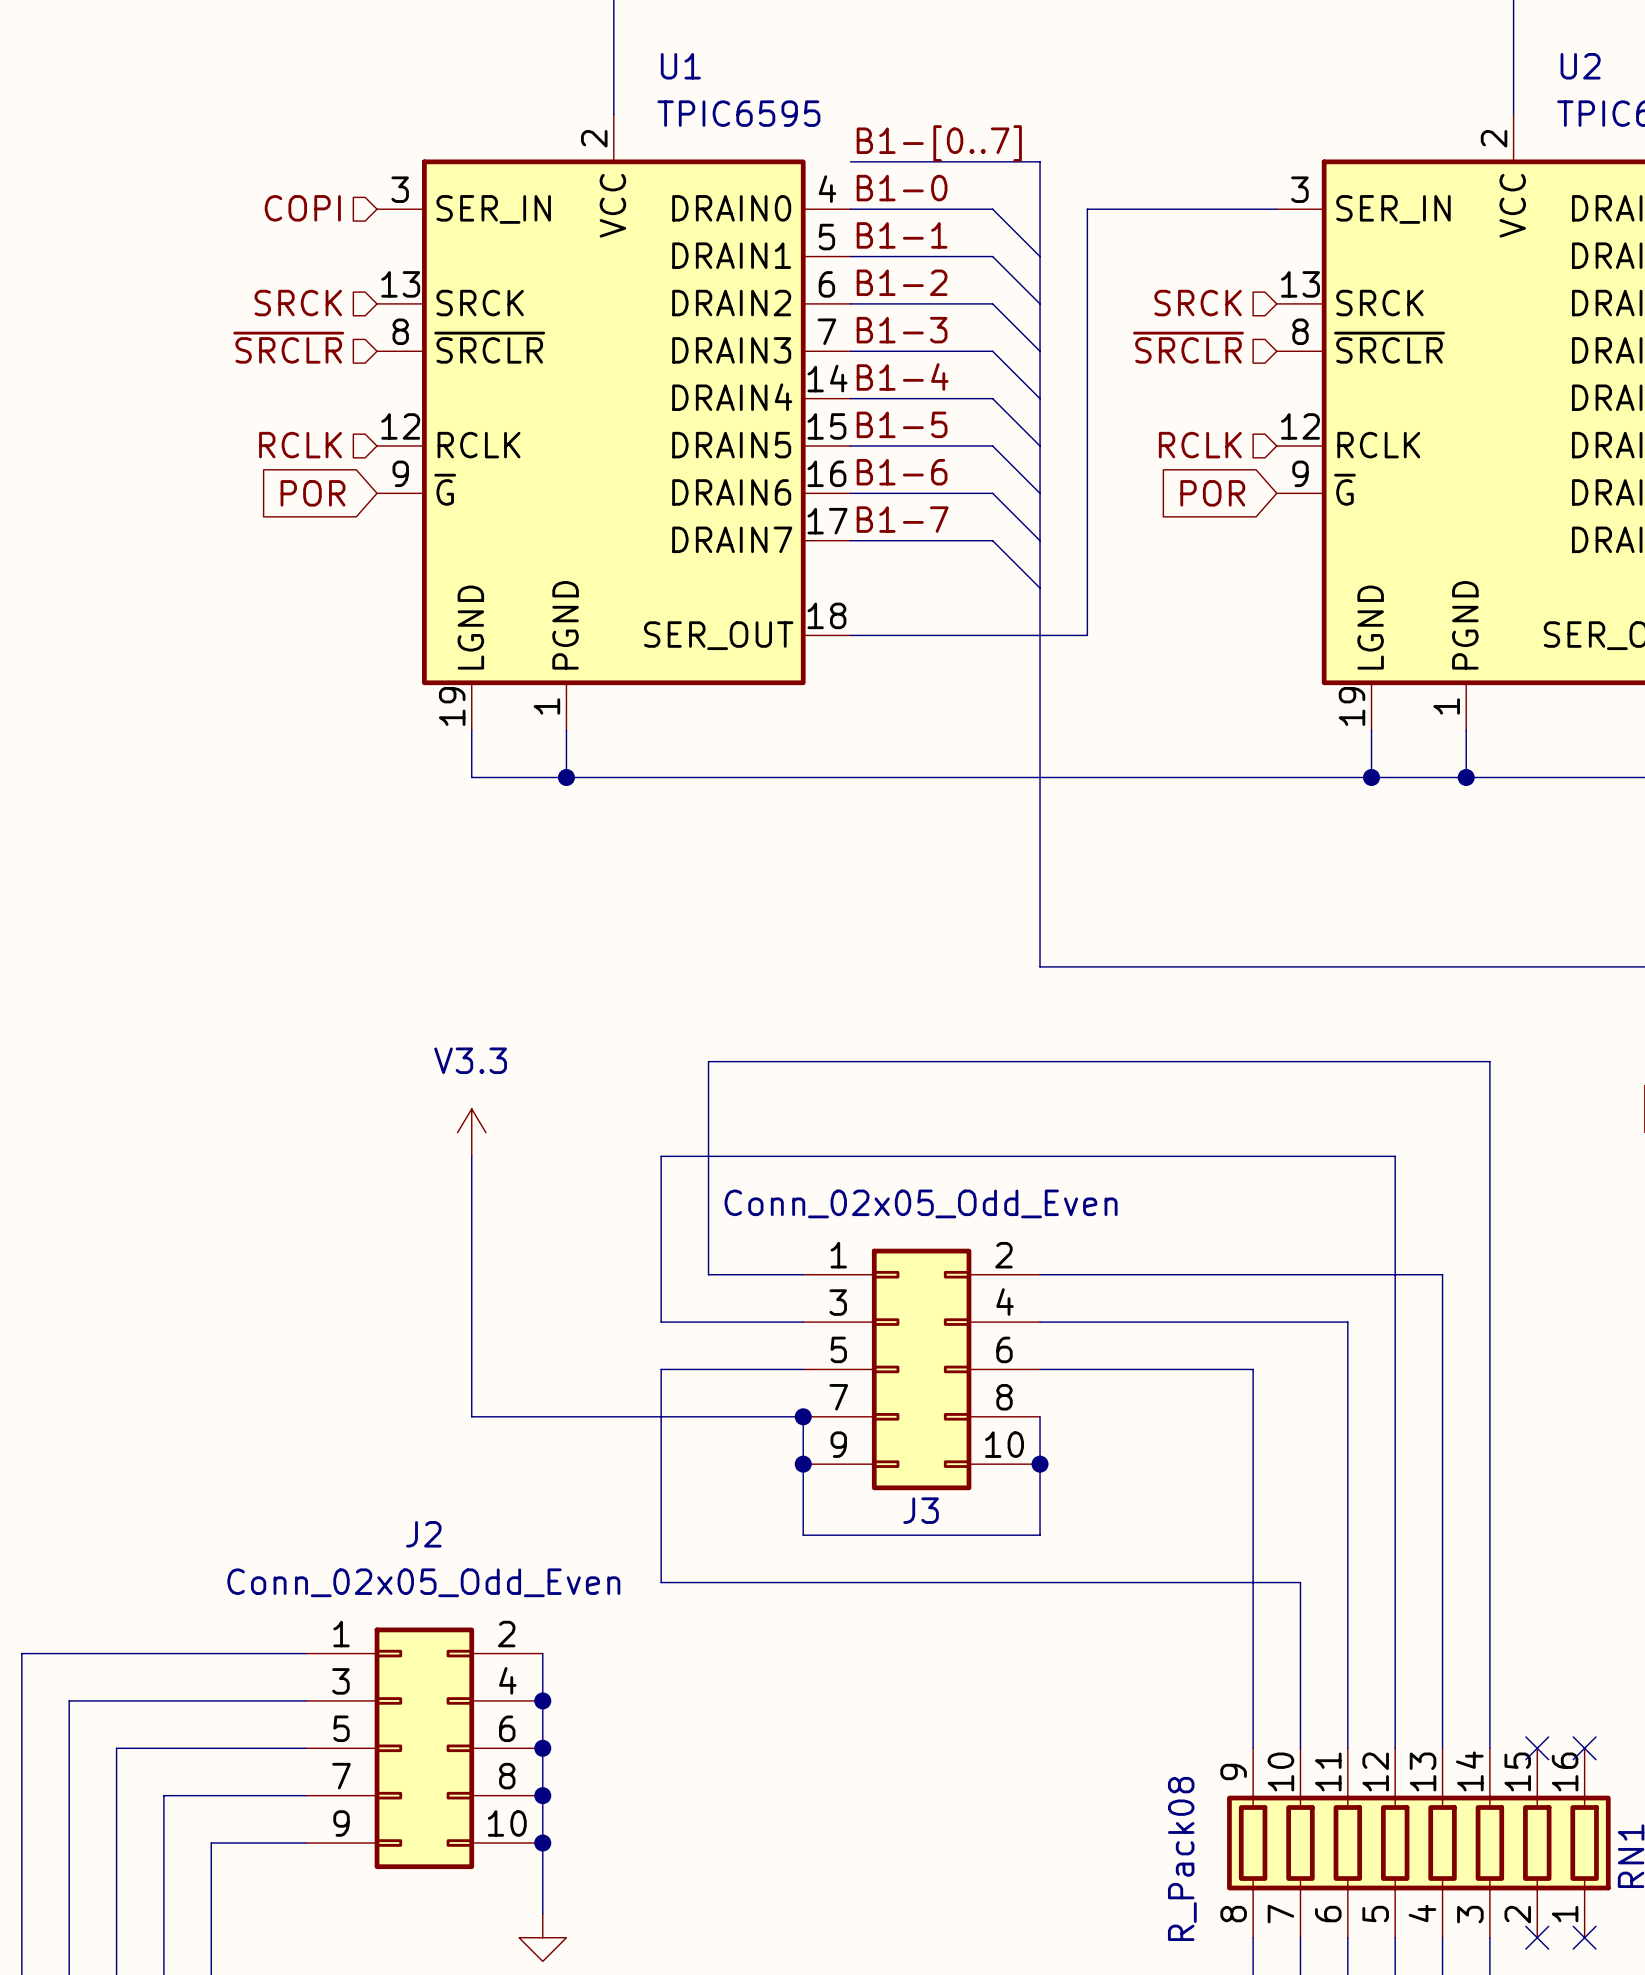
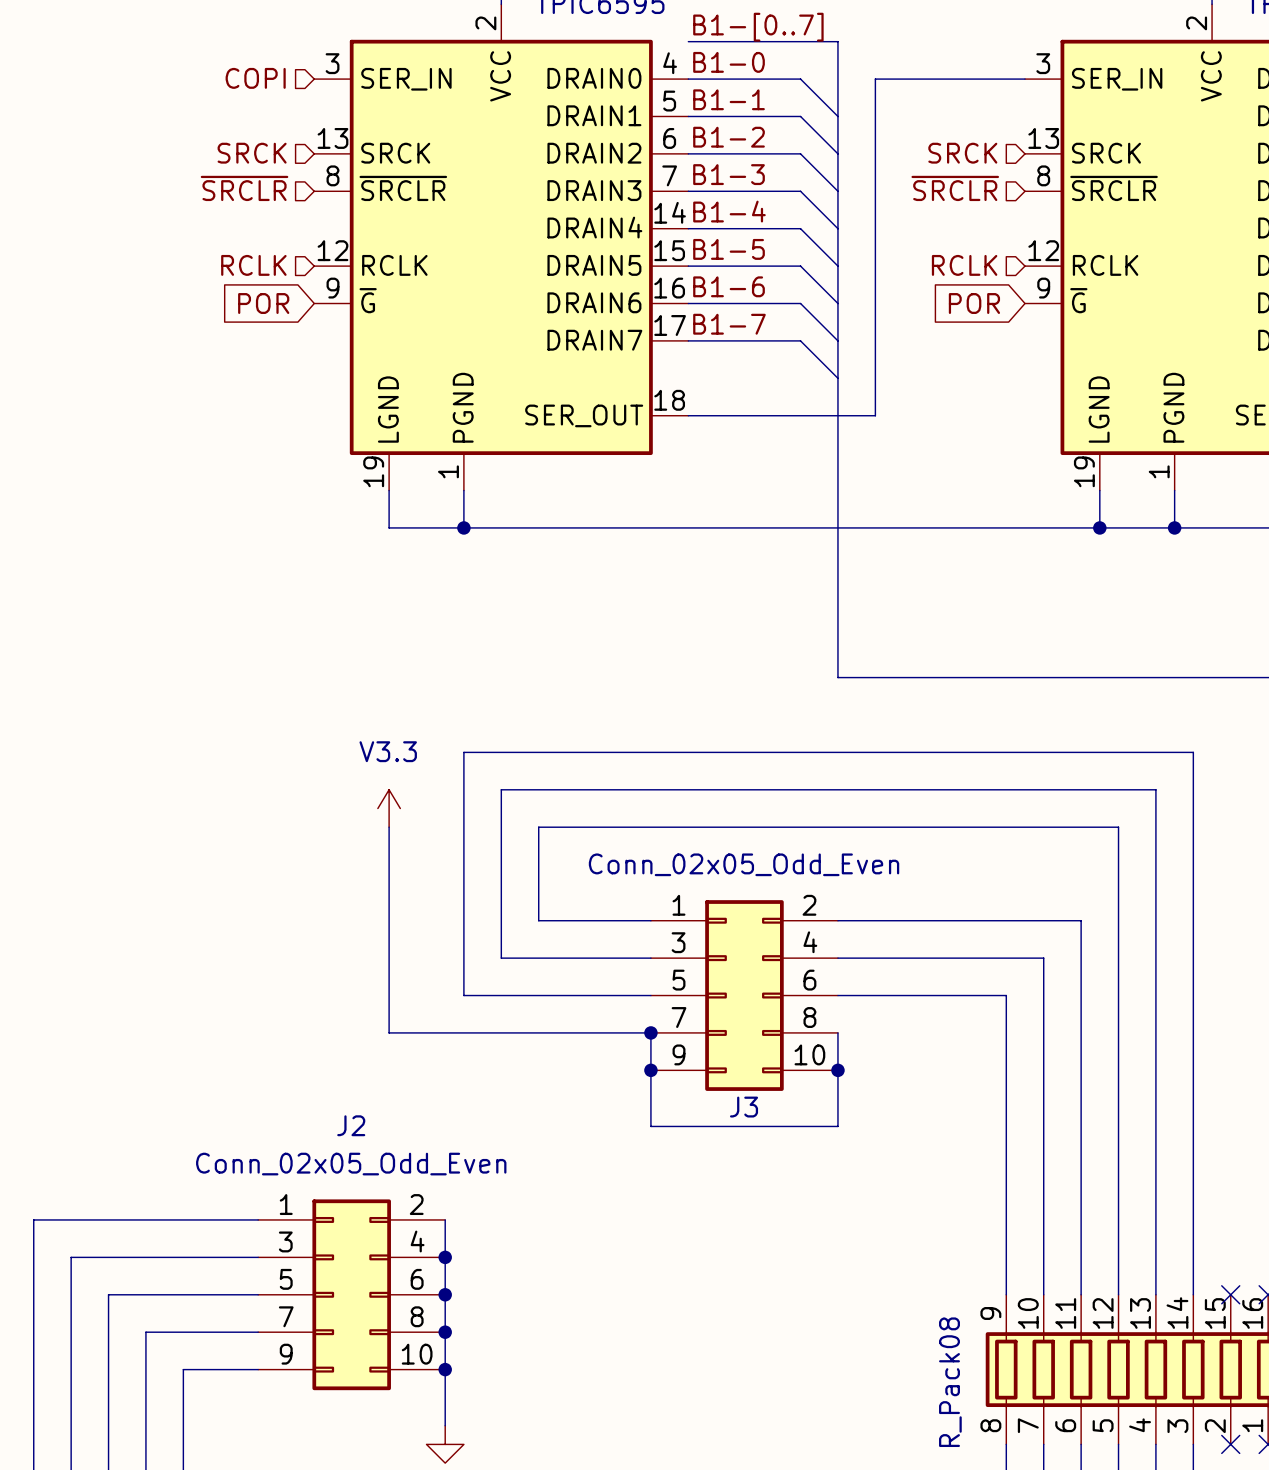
wire: (708, 1061) (708, 1274) -> (576, 752) (463, 752) (463, 995) (538, 995)
wire: (661, 1274) (661, 1322) -> (538, 920) (576, 920)
wire: (1347, 1274) (1442, 1274) -> (538, 958) (501, 958) (501, 789) (1155, 789) (1155, 920)
wire: (1300, 1322) (1347, 1322) -> (1081, 920) (1081, 958)
wire: (661, 1369) (661, 1582) (1300, 1582) -> (1043, 958) (1043, 1163)

